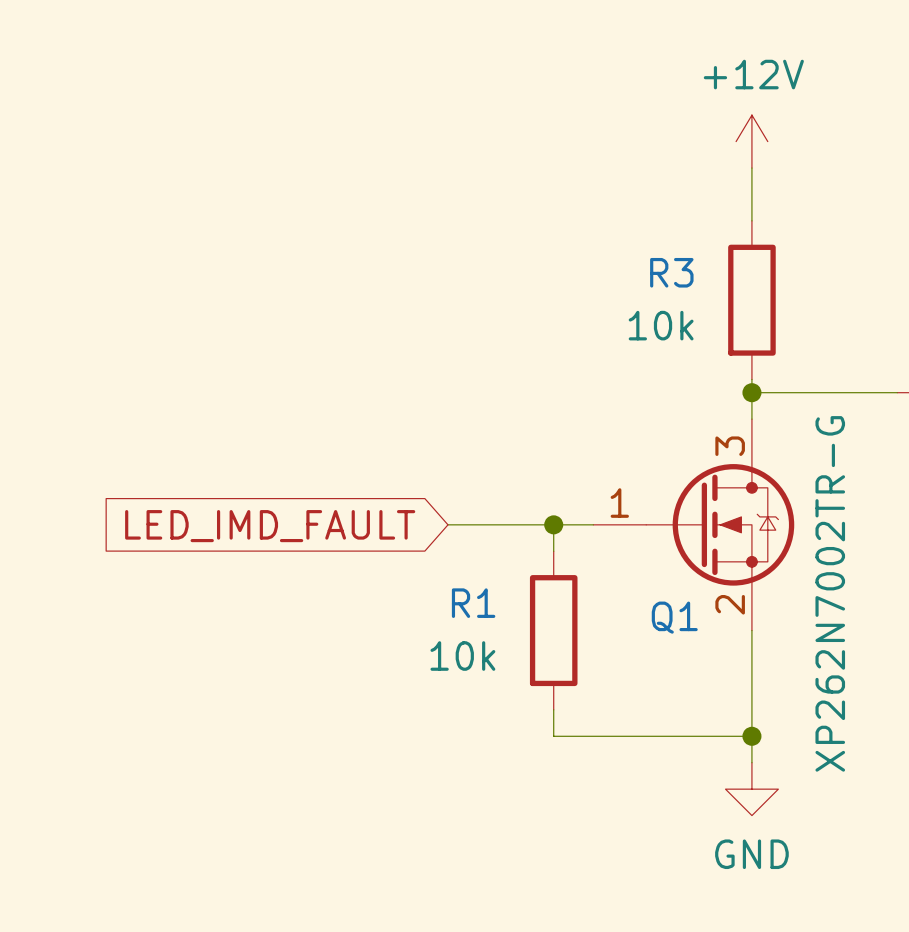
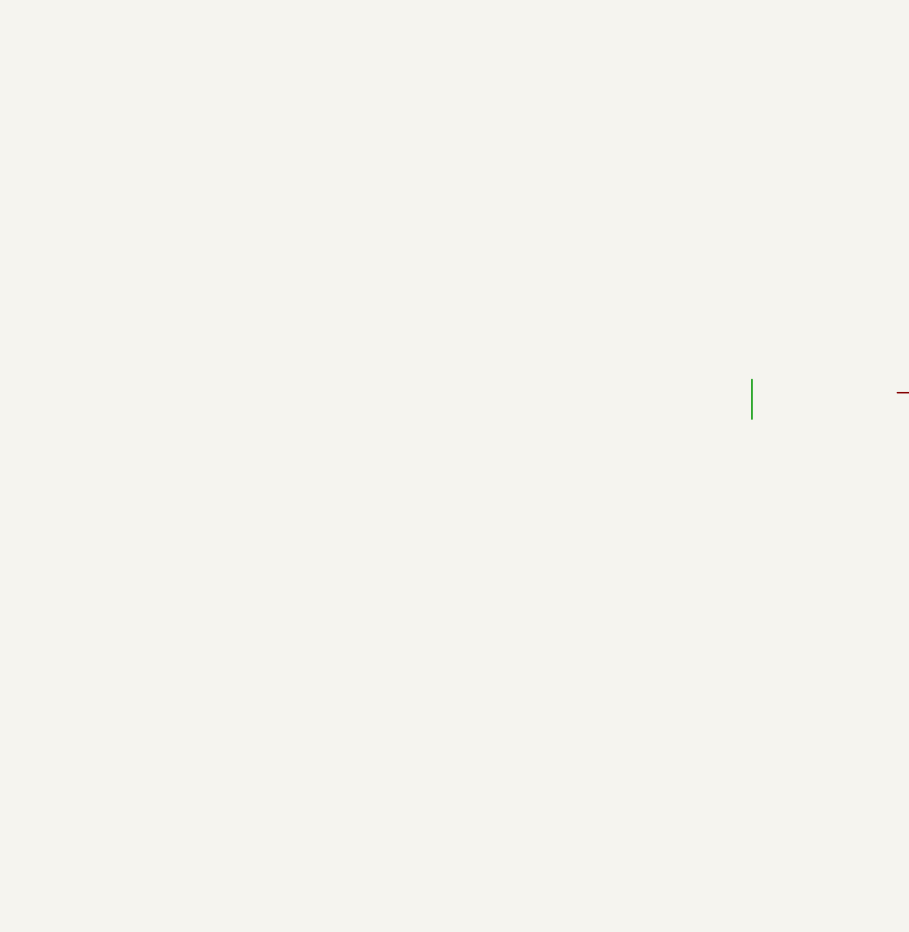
power symbol: +12V (751, 141) -> none
wire: (751, 168) (751, 220) -> none
R3: 10k (751, 300) -> none
wire: (751, 392) (897, 392) -> none
junction: (751, 392) -> none
wire: (447, 524) (593, 524) -> none
wire: (553, 524) (553, 551) -> none
junction: (553, 524) -> none
Q1: XP262N7002TR-G (693, 524) -> none
global label: LED_IMD_FAULT (270, 526) -> none
R1: 10k (553, 630) -> none
wire: (751, 630) (751, 762) -> none
wire: (553, 709) (553, 736) (751, 736) -> none
junction: (751, 736) -> none
power symbol: GND (751, 789) -> none

